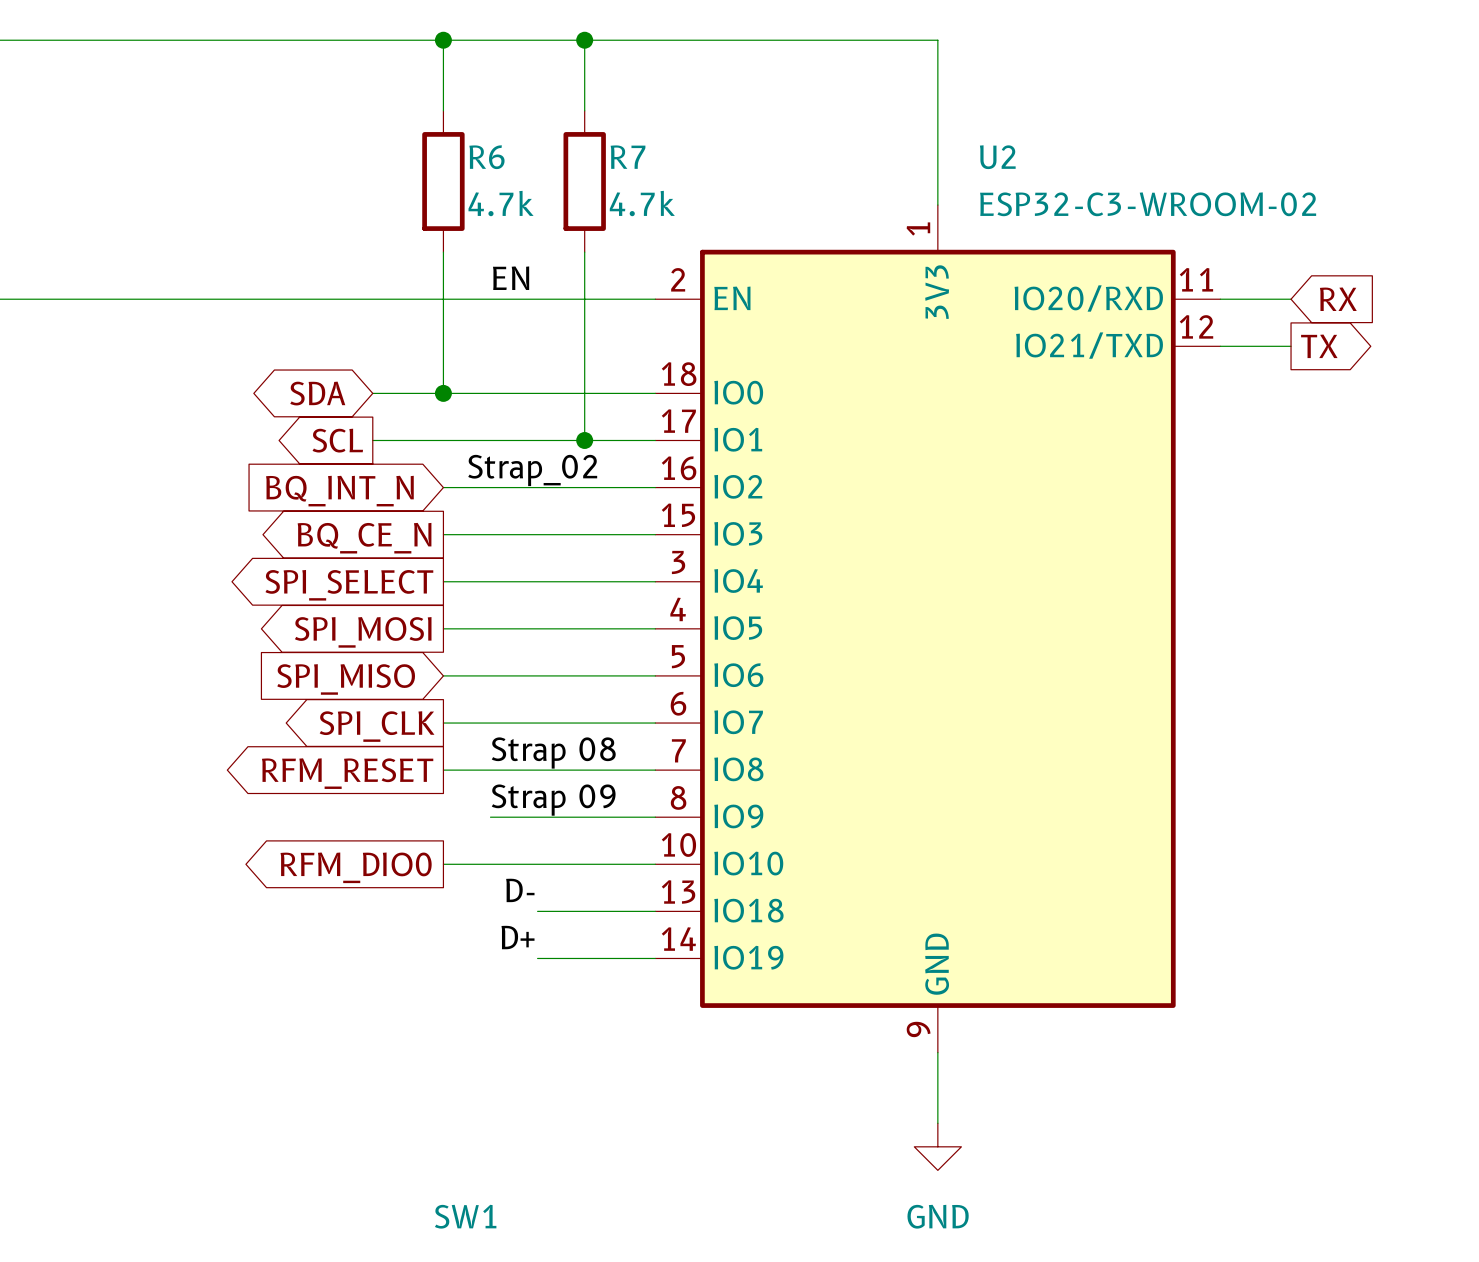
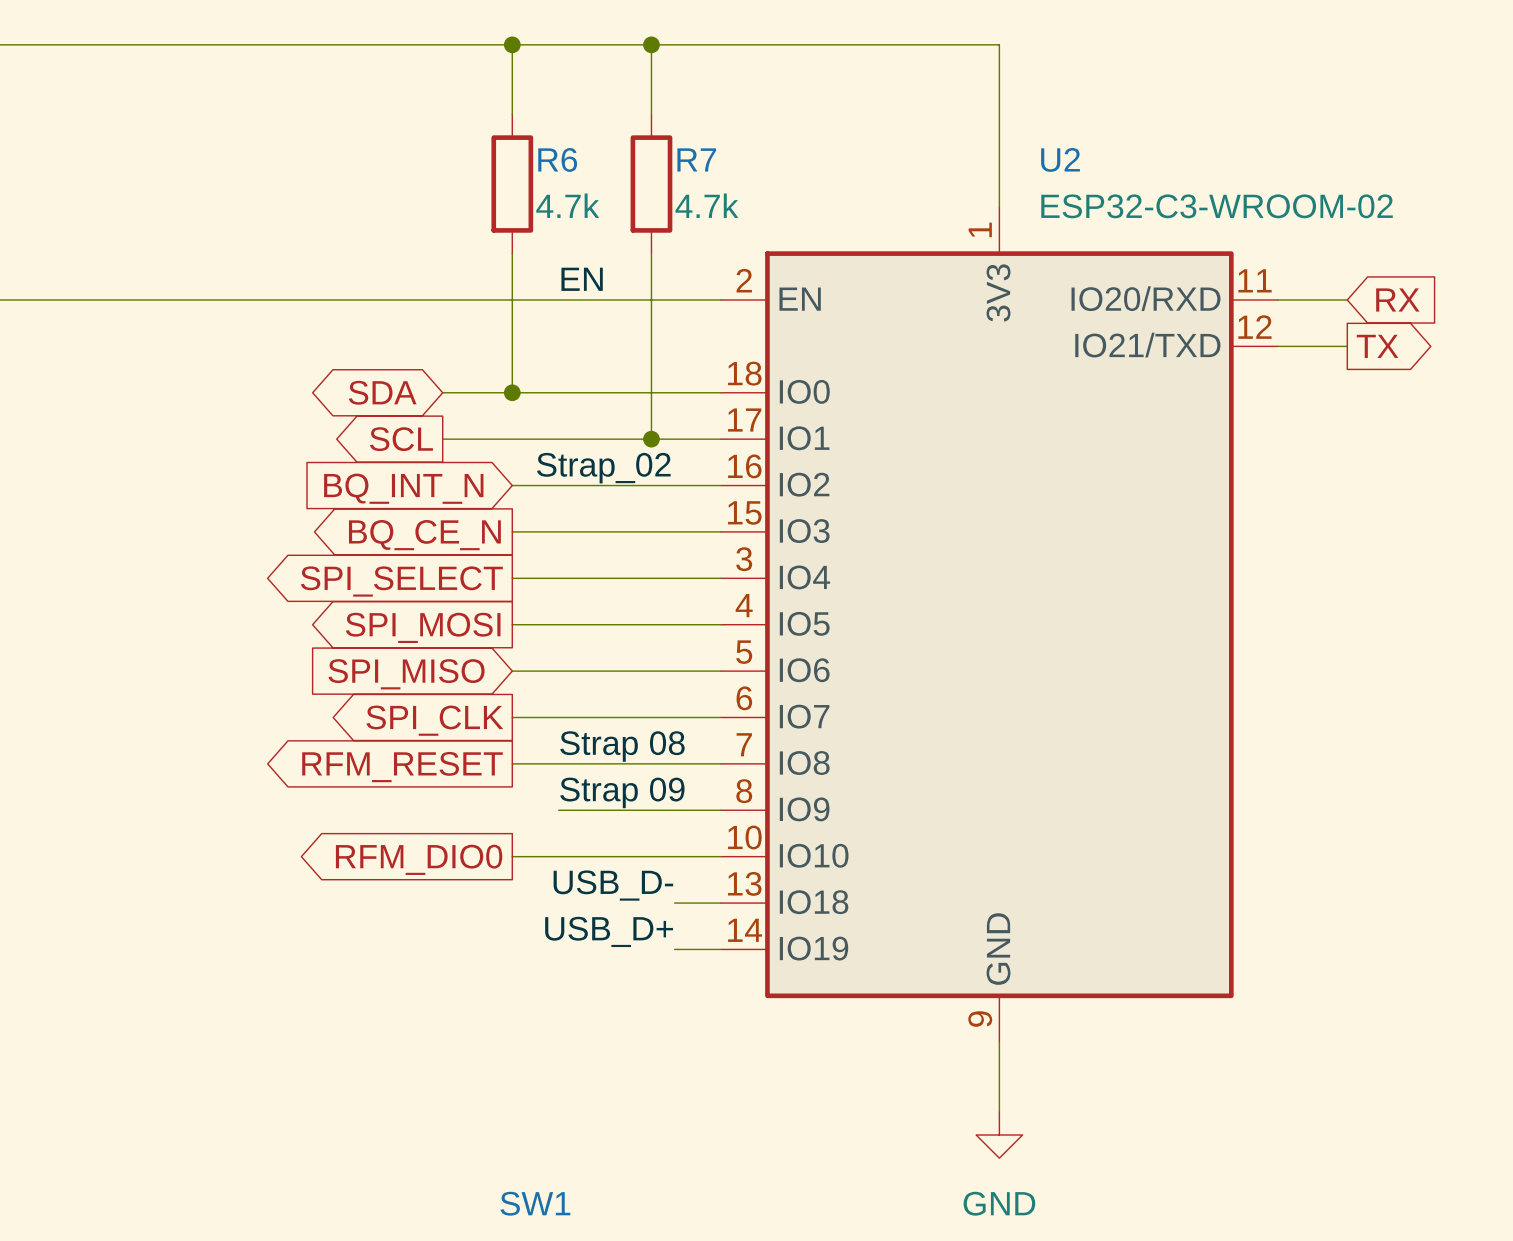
label: D- (520, 890) -> none
label: none -> USB_D- (613, 885)
wire: (537, 911) (608, 911) -> none
label: D+ (518, 937) -> none
label: none -> USB_D+ (609, 931)
wire: (537, 958) (608, 958) -> none

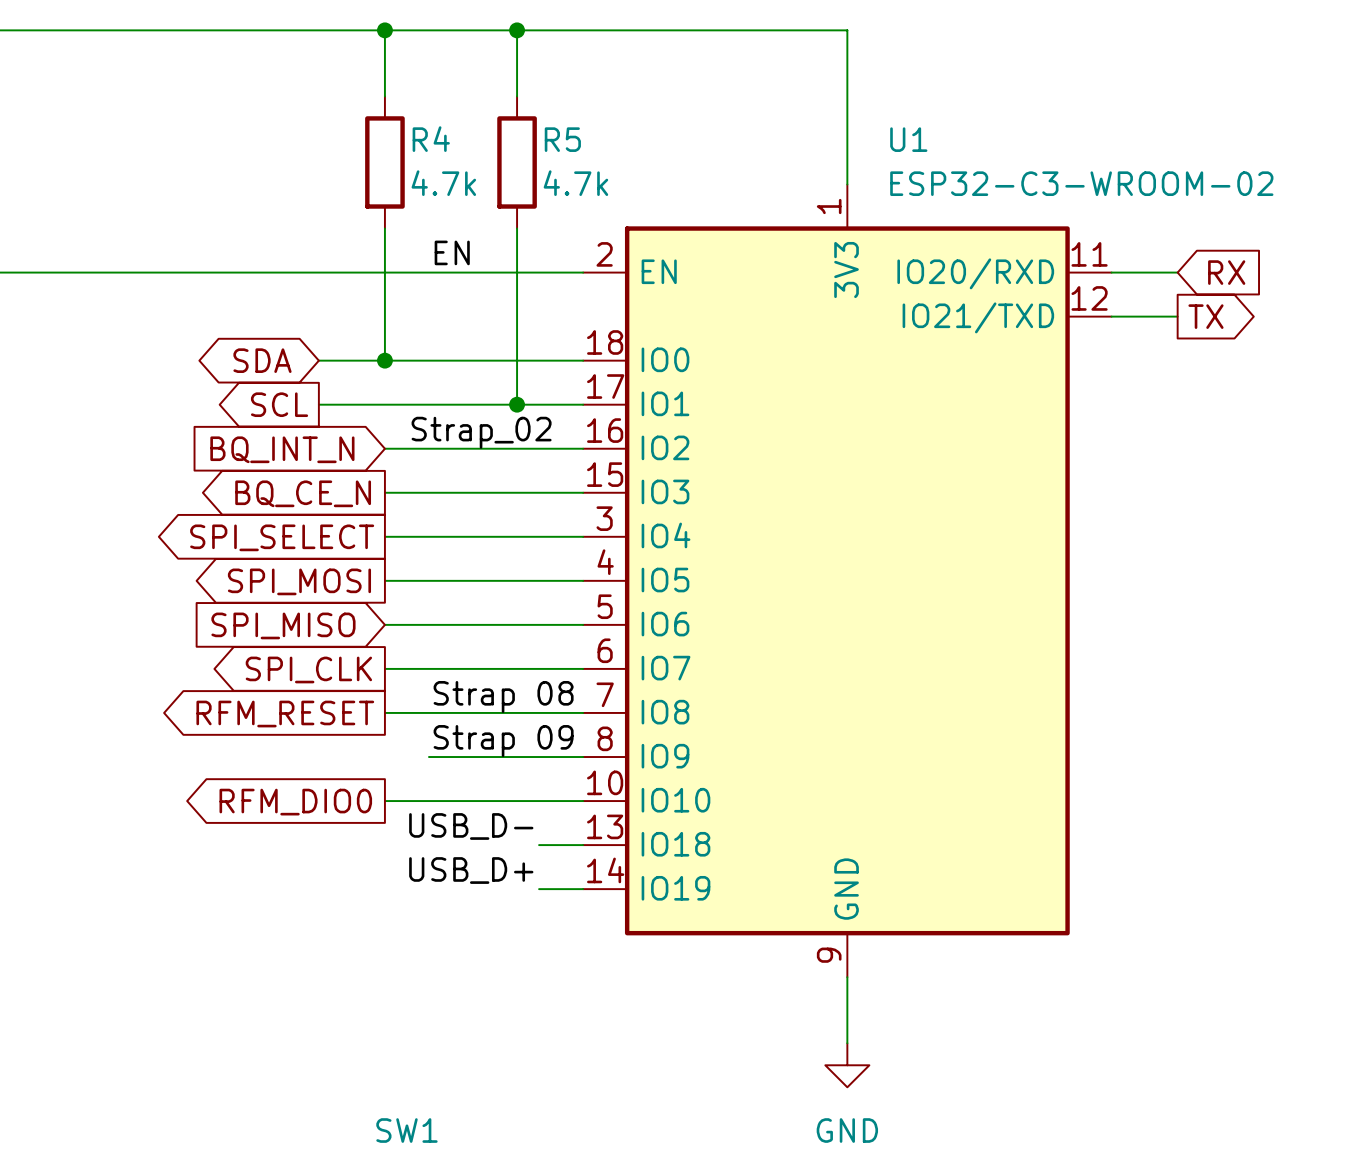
R6 name: R6 (557, 159) -> R4 (431, 139)
R7 name: R7 (696, 159) -> R5 (562, 139)
U2 name: U2 (1060, 159) -> U1 (908, 139)

